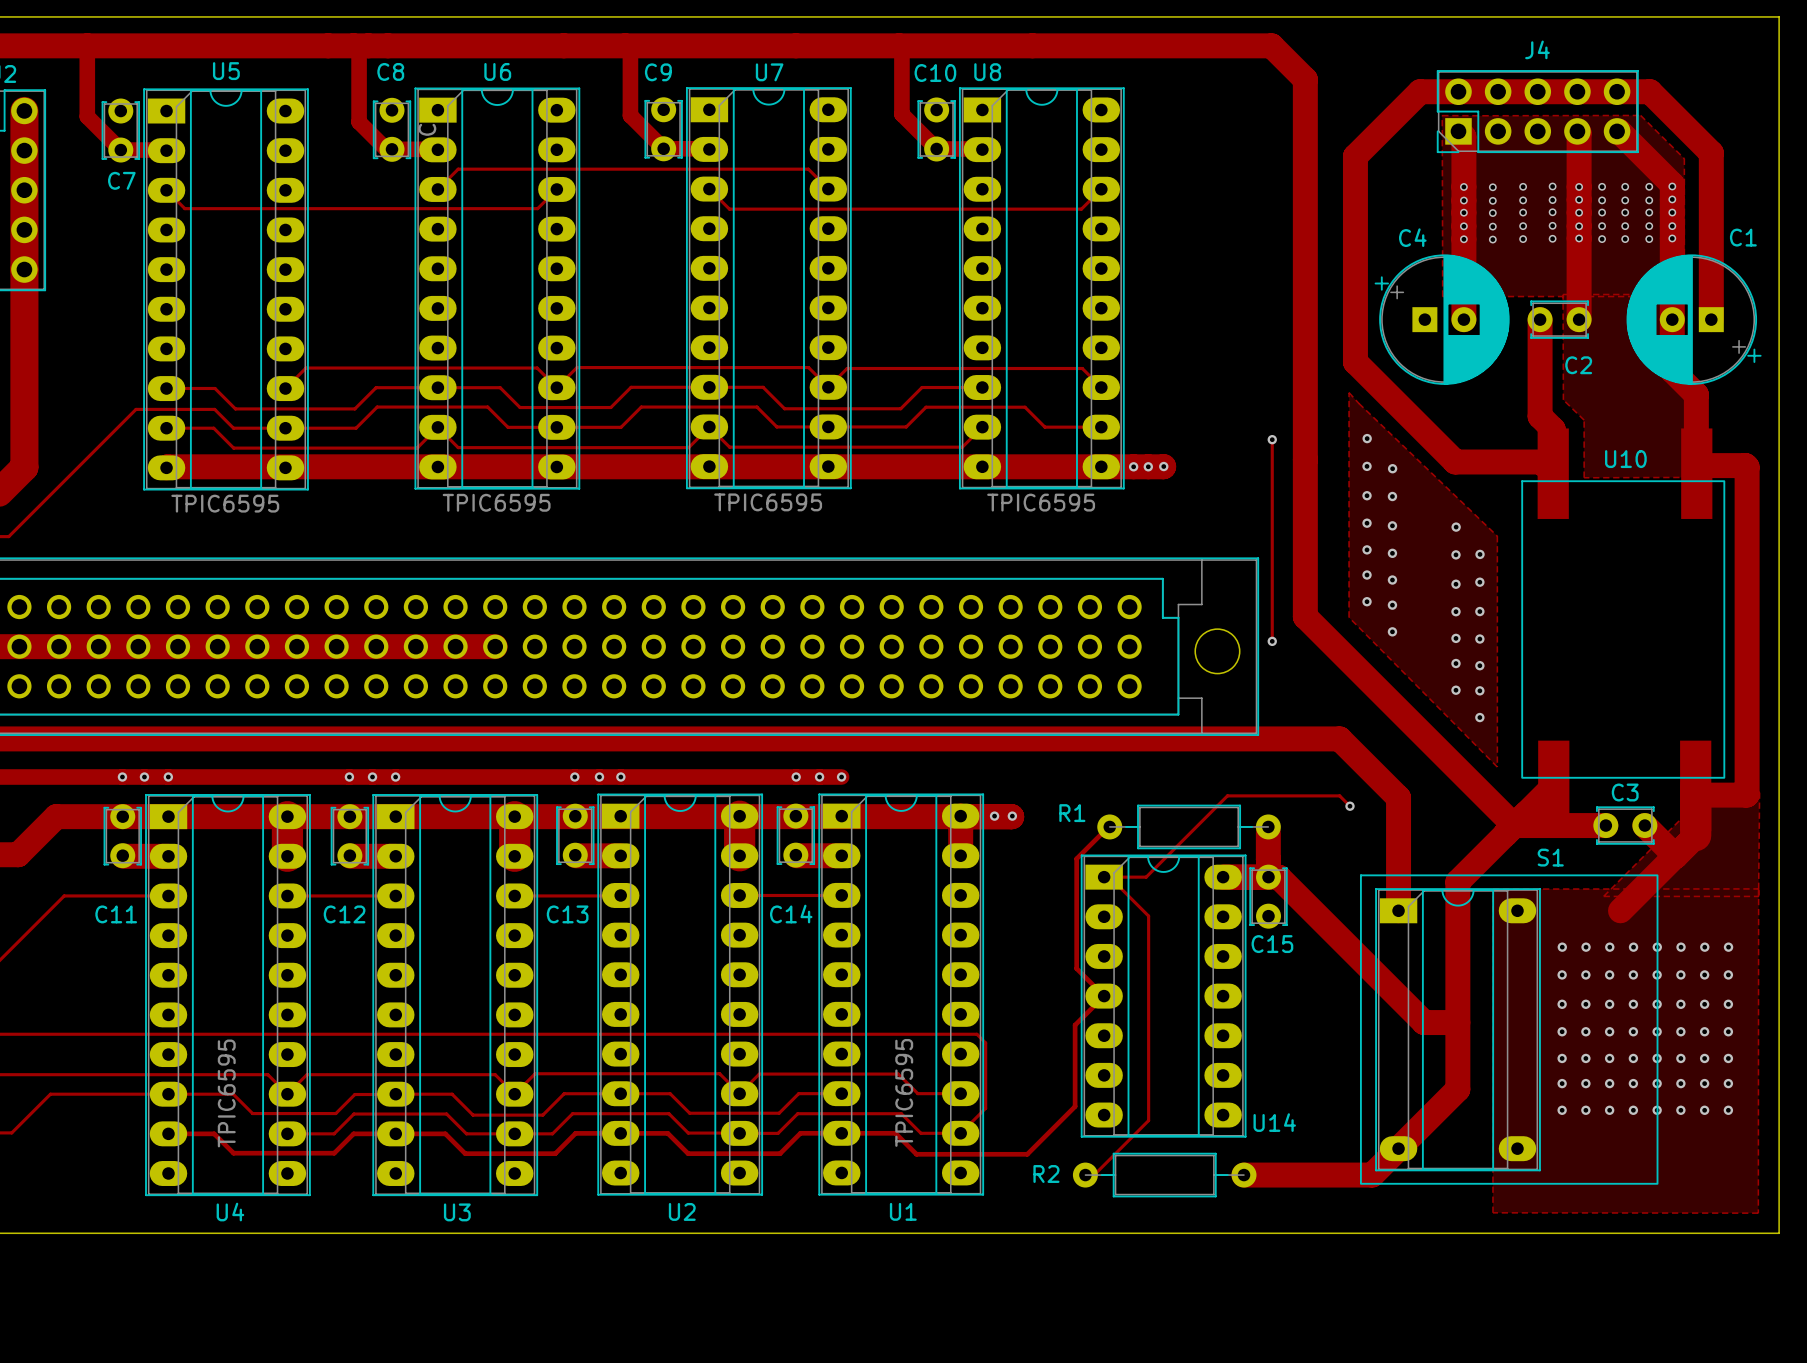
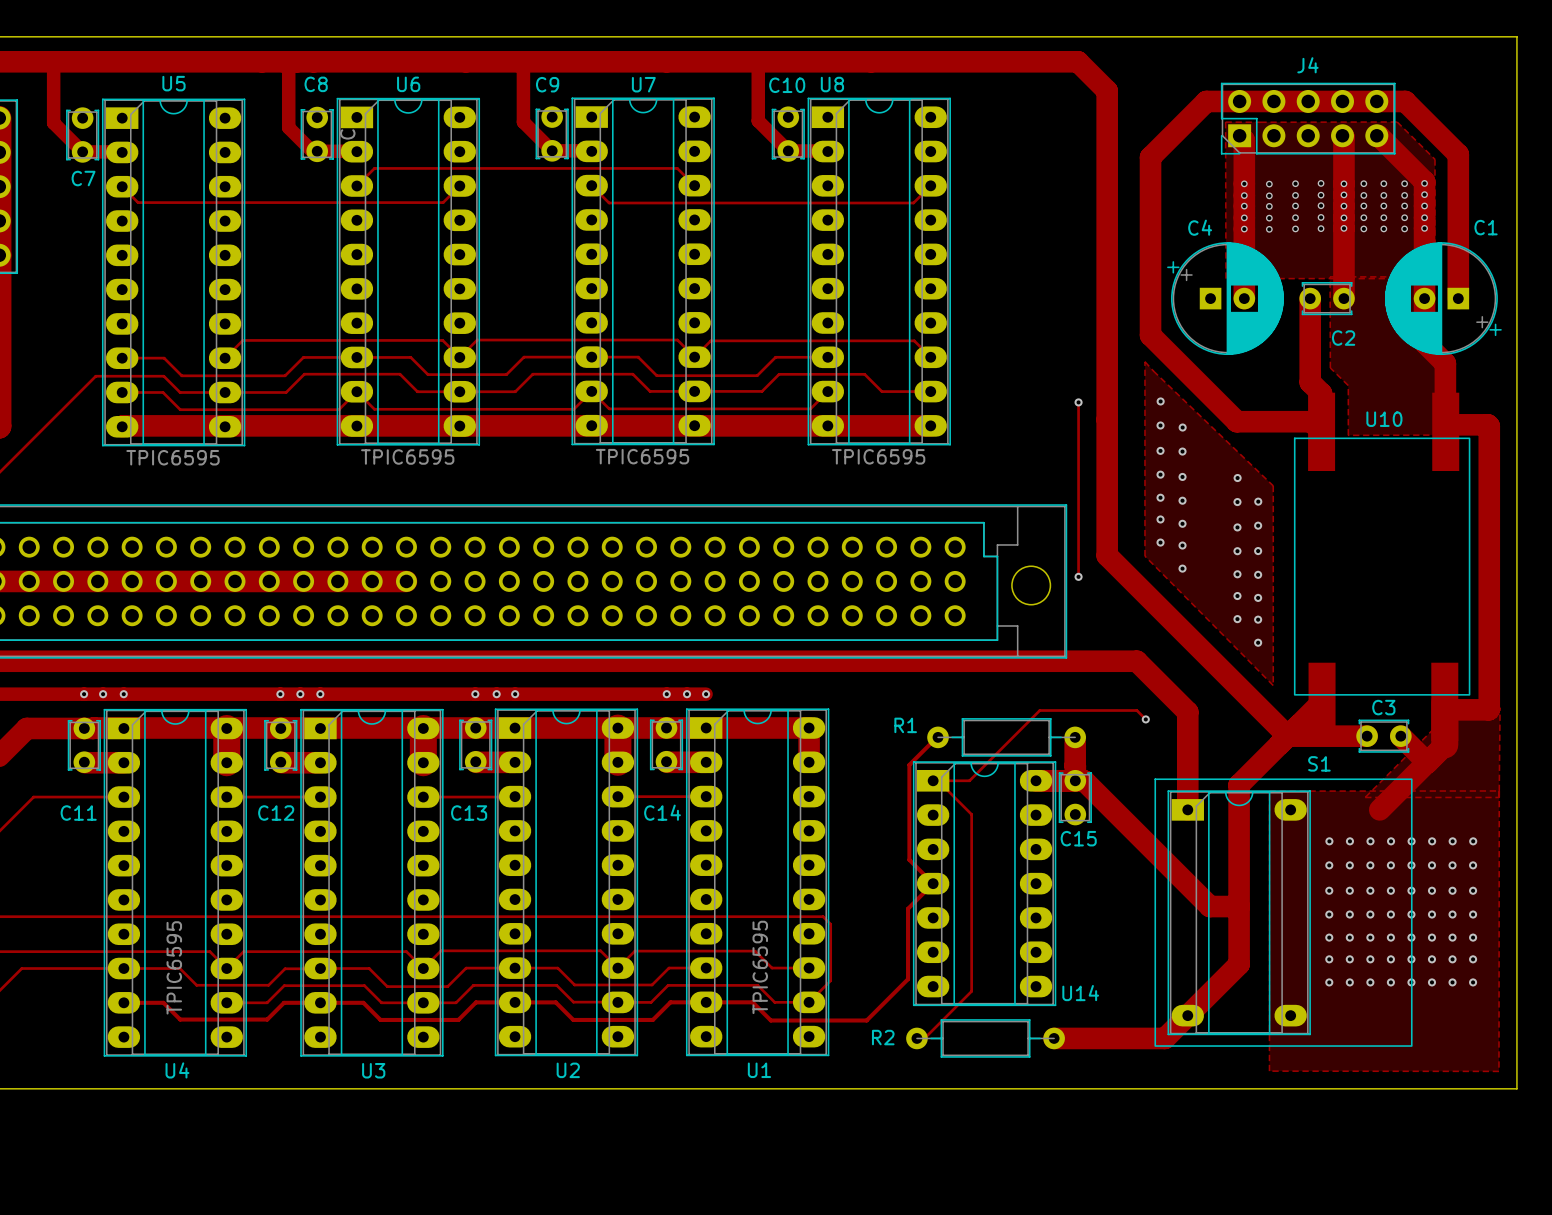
via: (1133, 466) -> none
via: (1148, 466) -> none
track: (1163, 466) (1101, 466) -> none
via: (1163, 466) -> none
track: (133, 816) (1011, 816) -> (93, 728) (809, 727)
via: (994, 816) -> none
via: (1012, 816) -> none

